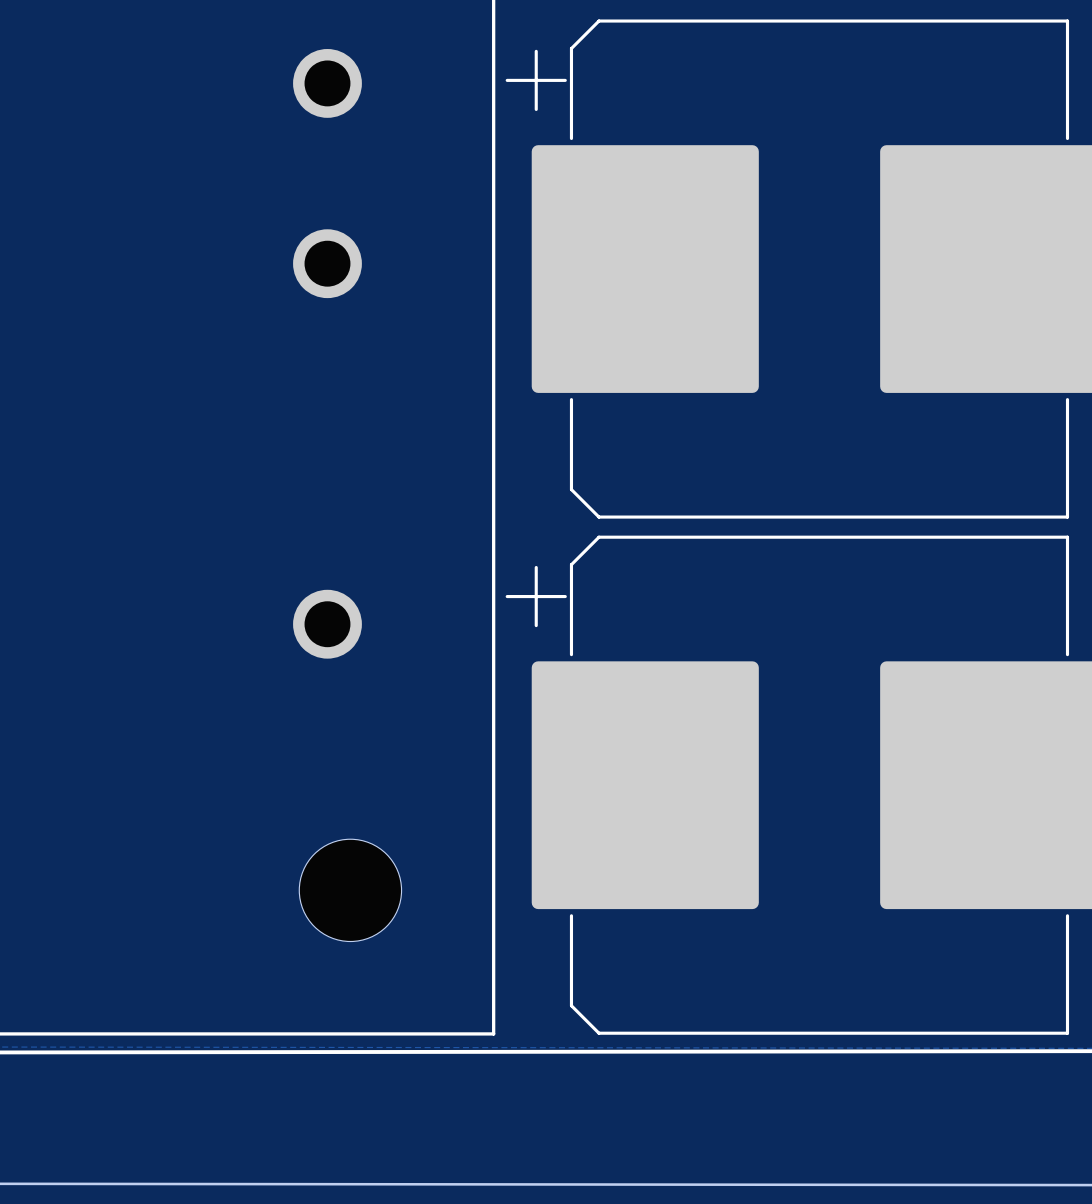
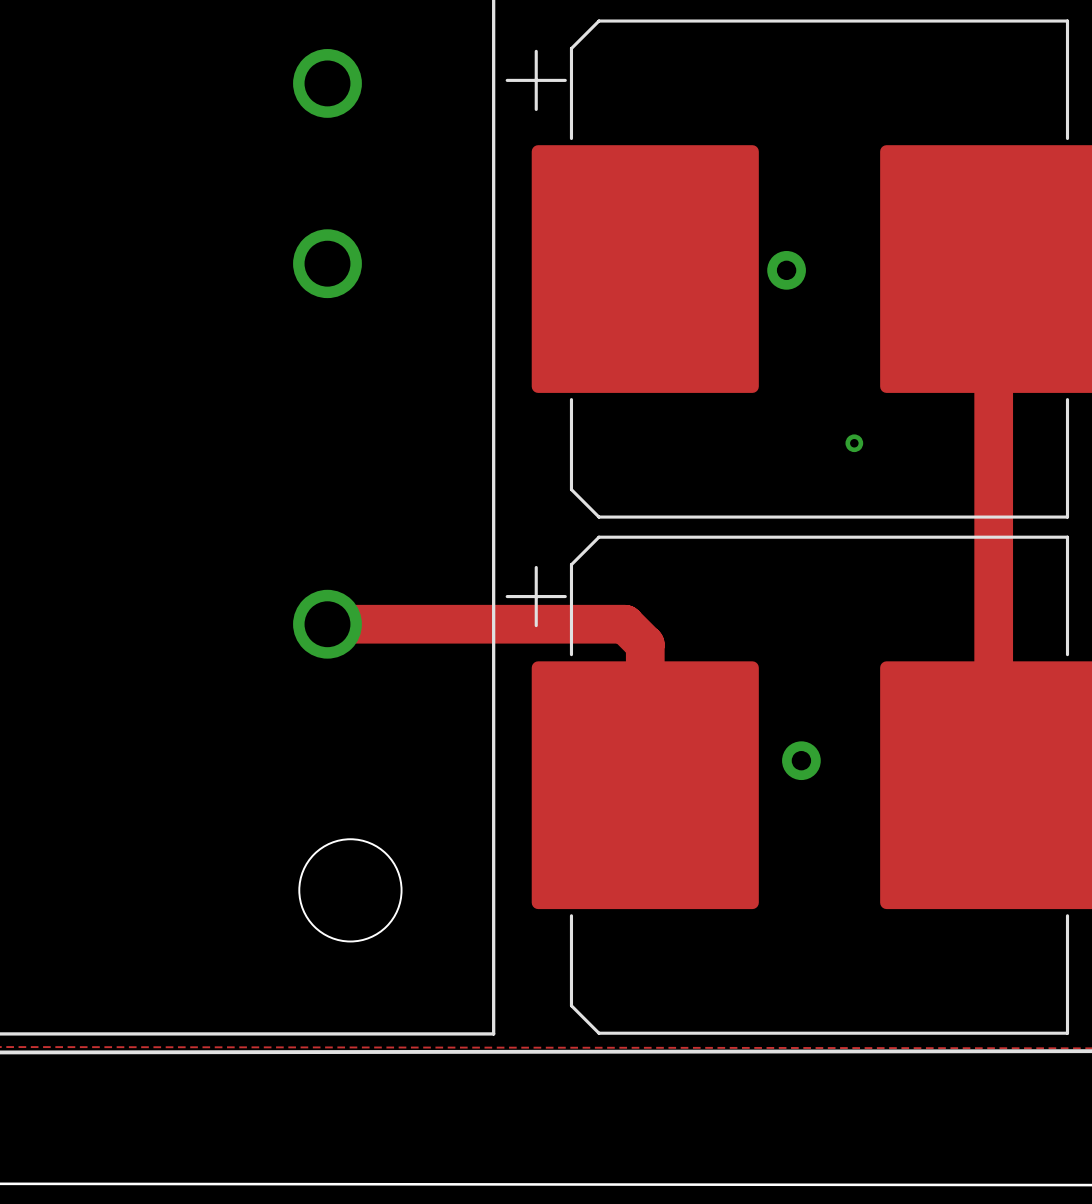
track: none -> (993, 269) (993, 785)
via: none -> (786, 270)
via: none -> (854, 443)
track: none -> (327, 624) (624, 624) (645, 644) (645, 785)
via: none -> (801, 760)

